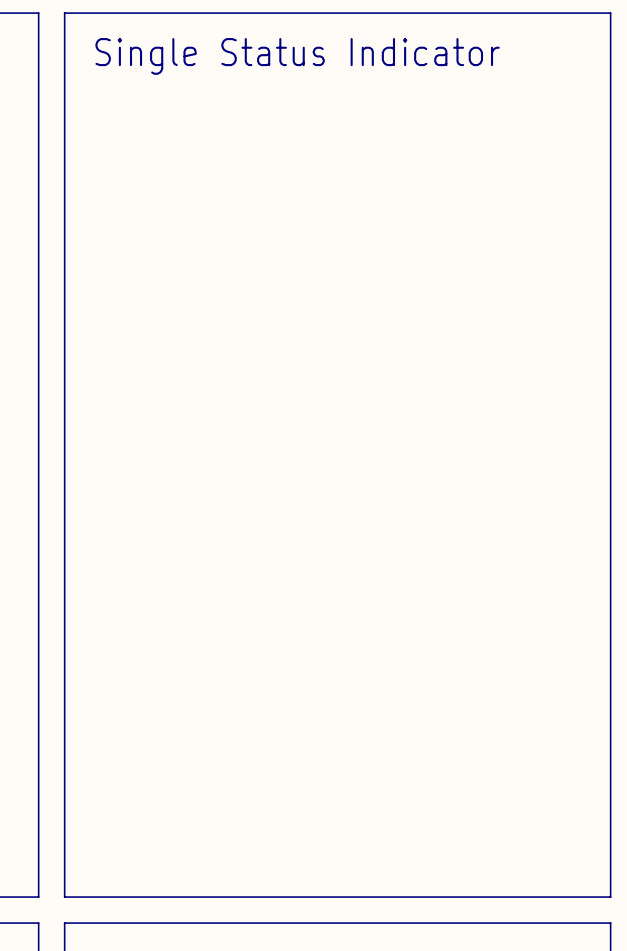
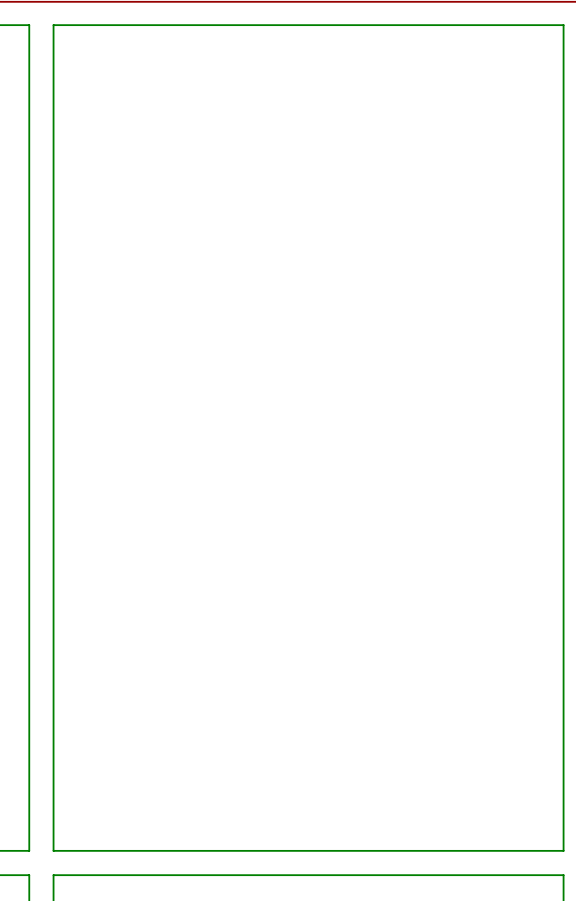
text: Single Status Indicator (297, 56) -> none

